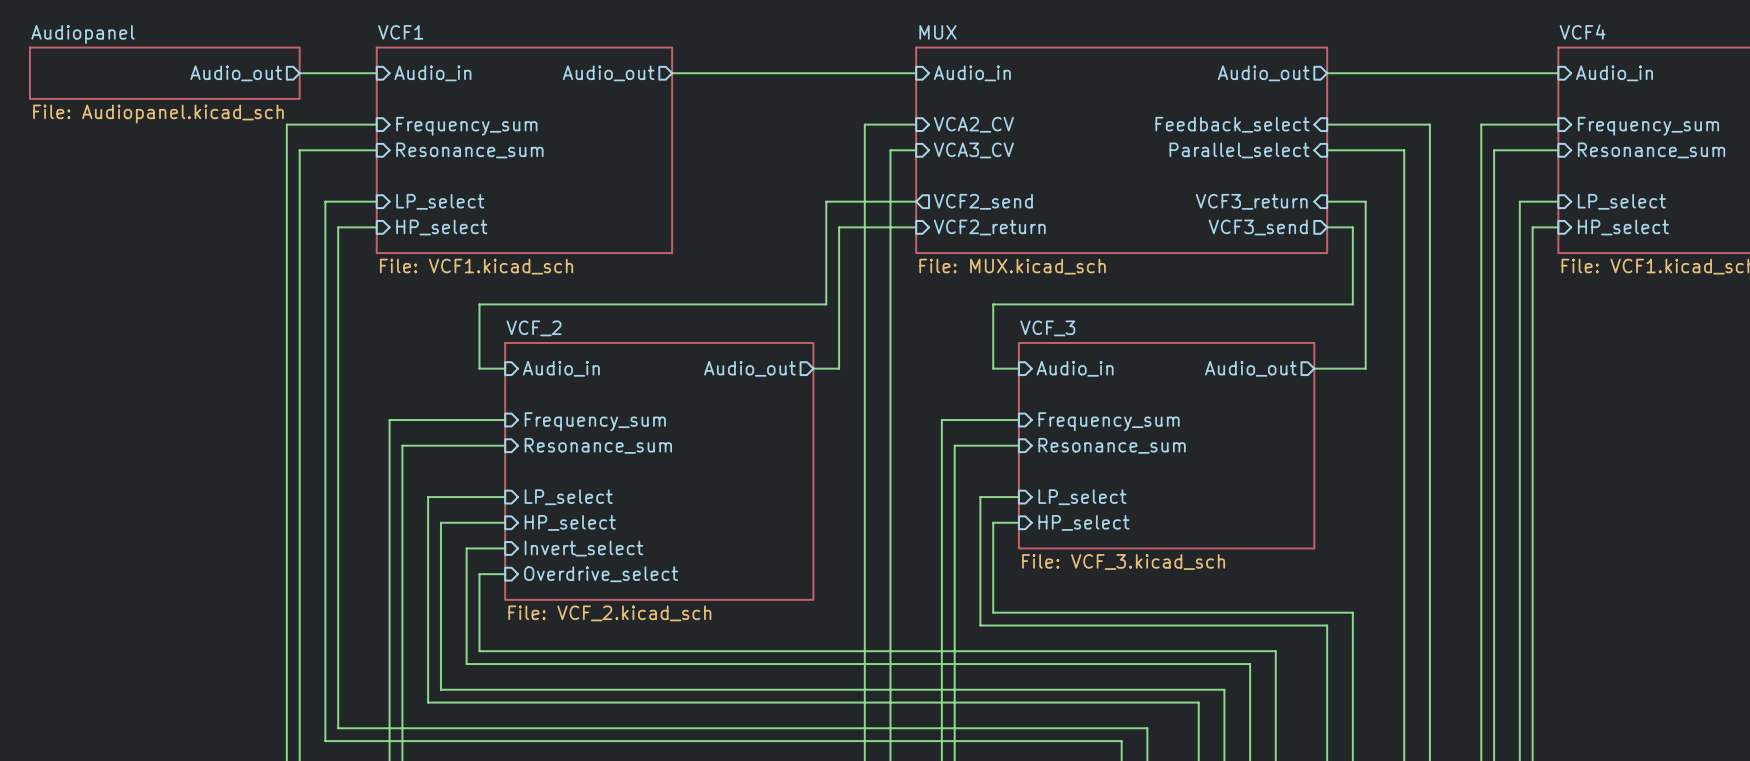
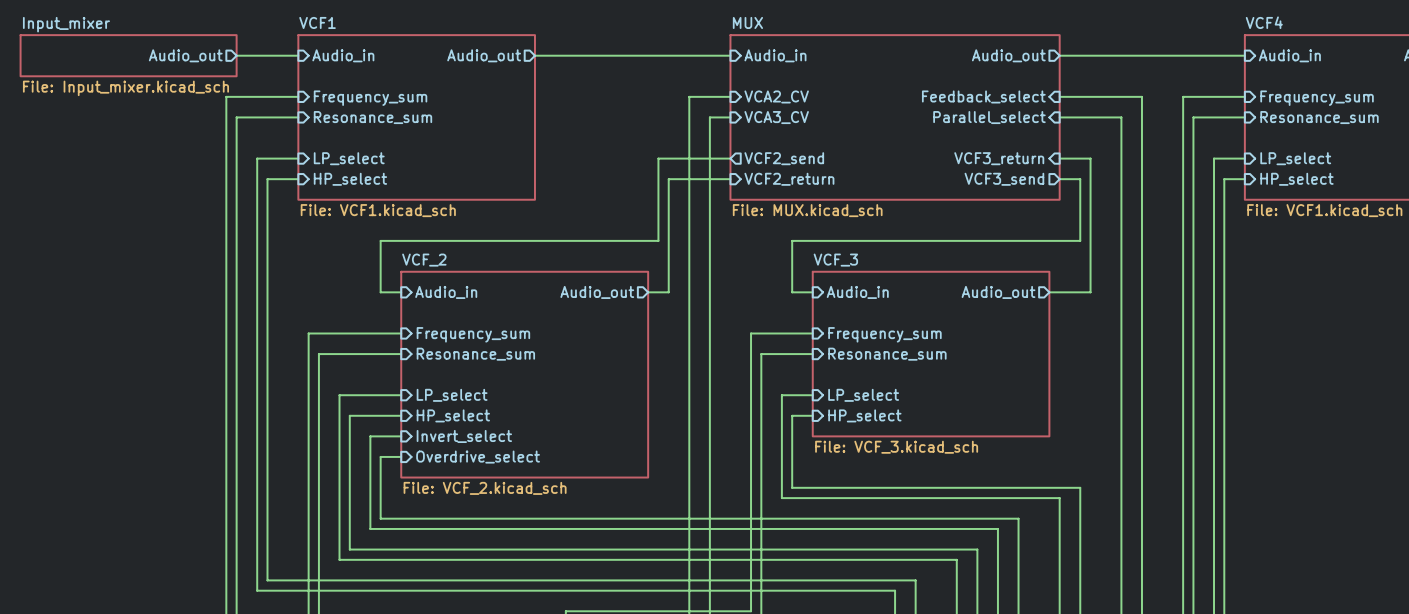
sheet Audiopanel name: Audiopanel (82, 34) -> Input_mixer (66, 24)
sheet Audiopanel value: File: Audiopanel.kicad_sch (158, 114) -> File: Input_mixer.kicad_sch (125, 88)

